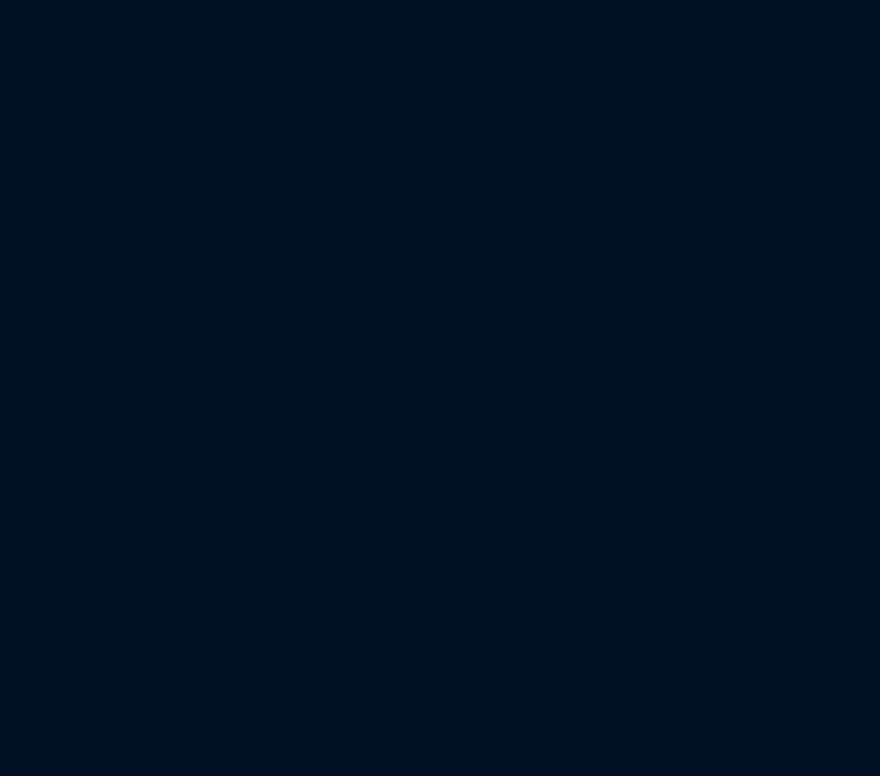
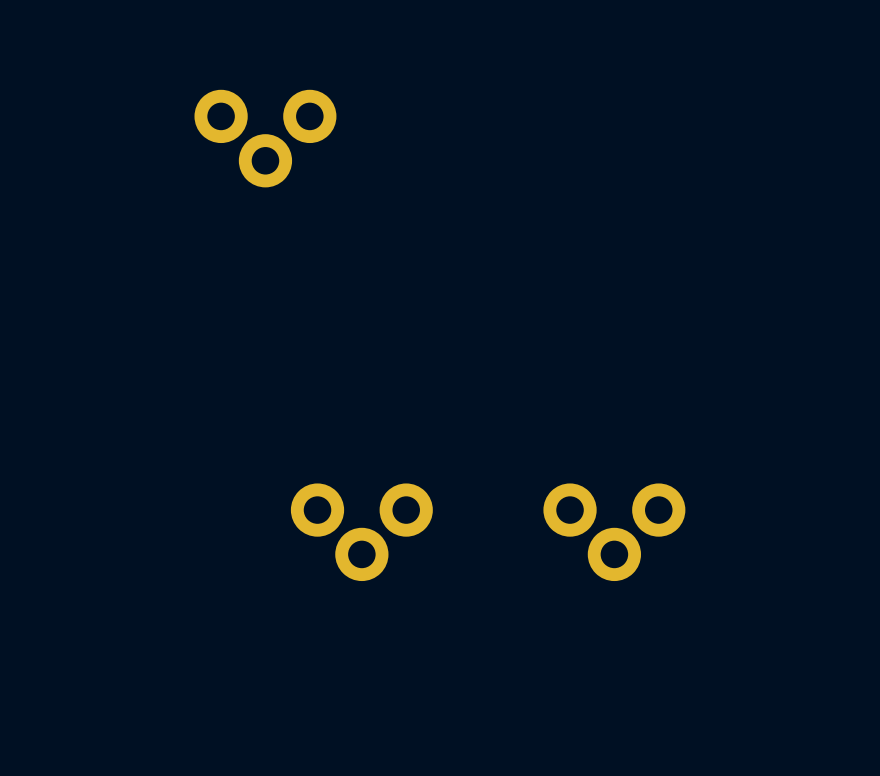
part: none -> (265, 138)
part: none -> (361, 532)
part: none -> (614, 532)

